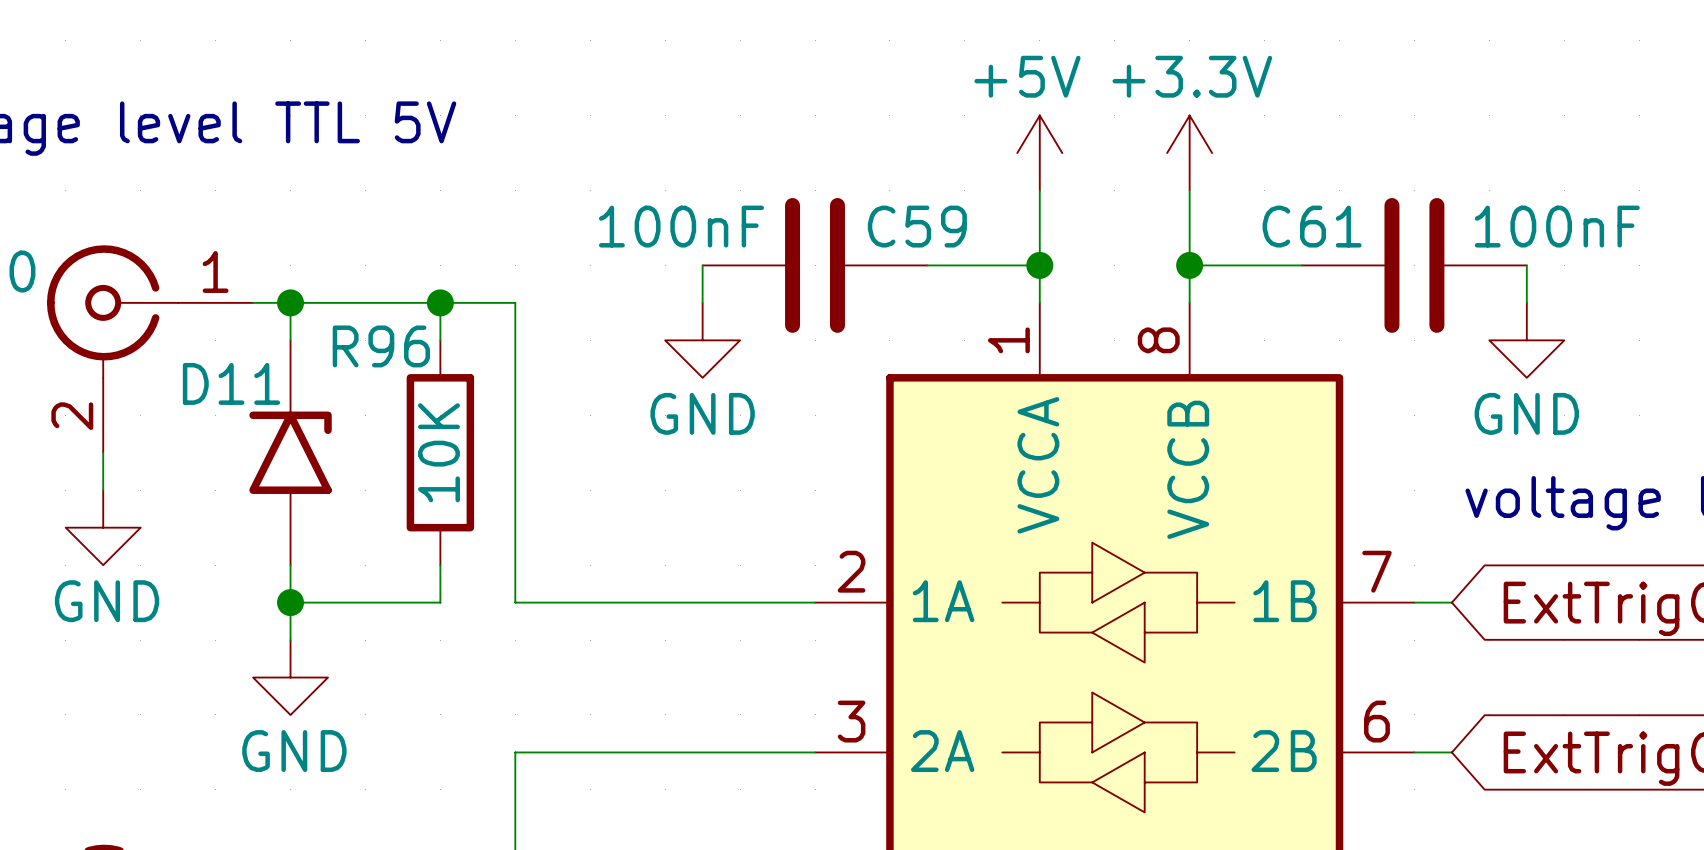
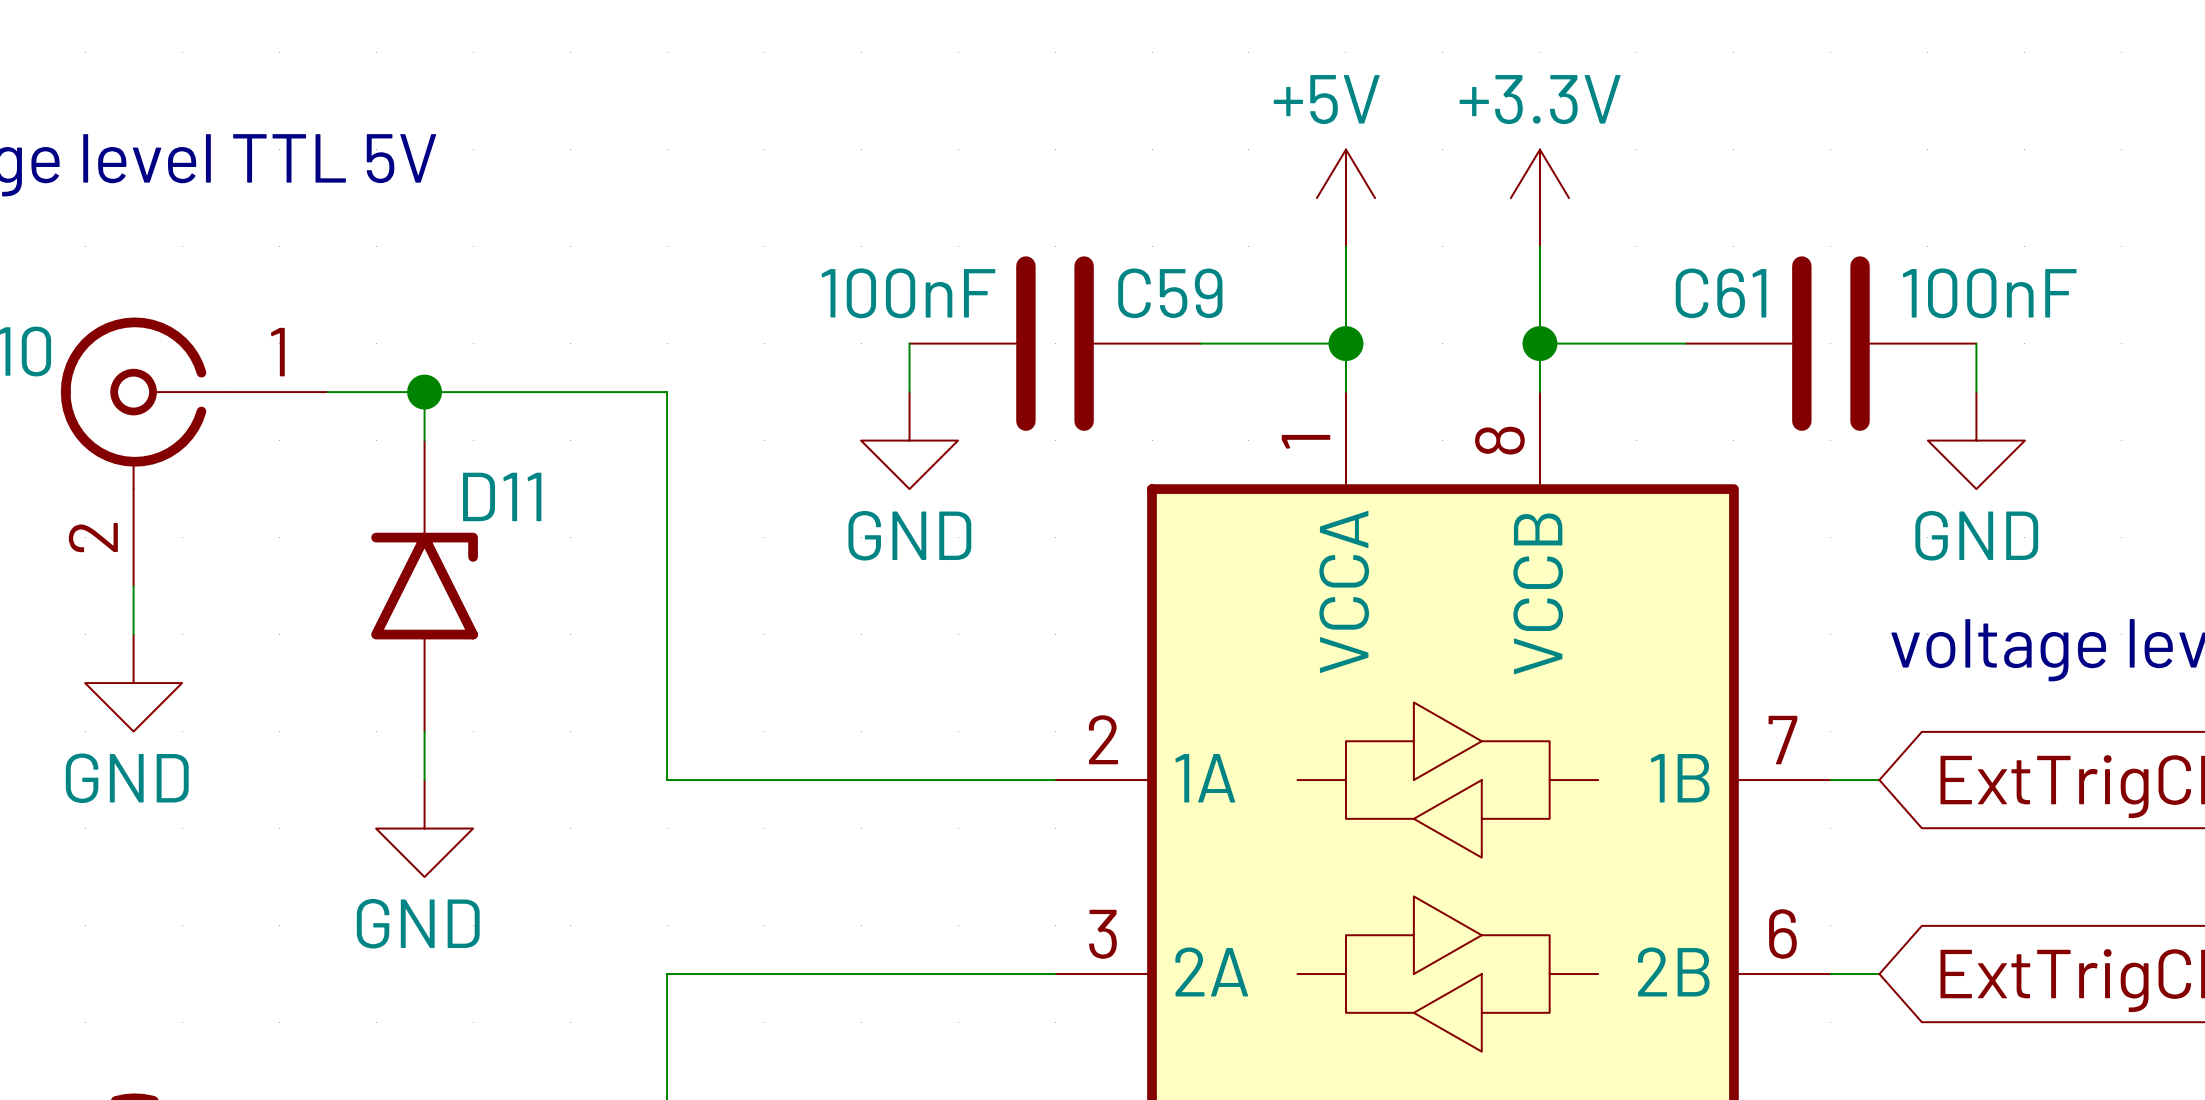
wire: (290, 302) (290, 340) -> (424, 392) (424, 440)
junction position: (290, 302) -> (424, 392)
wire: (440, 302) (440, 340) -> (424, 731) (424, 780)
junction: (440, 302) -> none
D11 name position: D11 (231, 383) -> D11 (502, 496)
D11 position: (290, 452) -> (424, 586)
R96: 10K (440, 452) -> none
wire: (290, 565) (290, 640) -> none
wire: (440, 565) (440, 602) (290, 602) -> none
junction: (290, 602) -> none
power symbol position: GND (290, 677) -> GND (424, 828)

